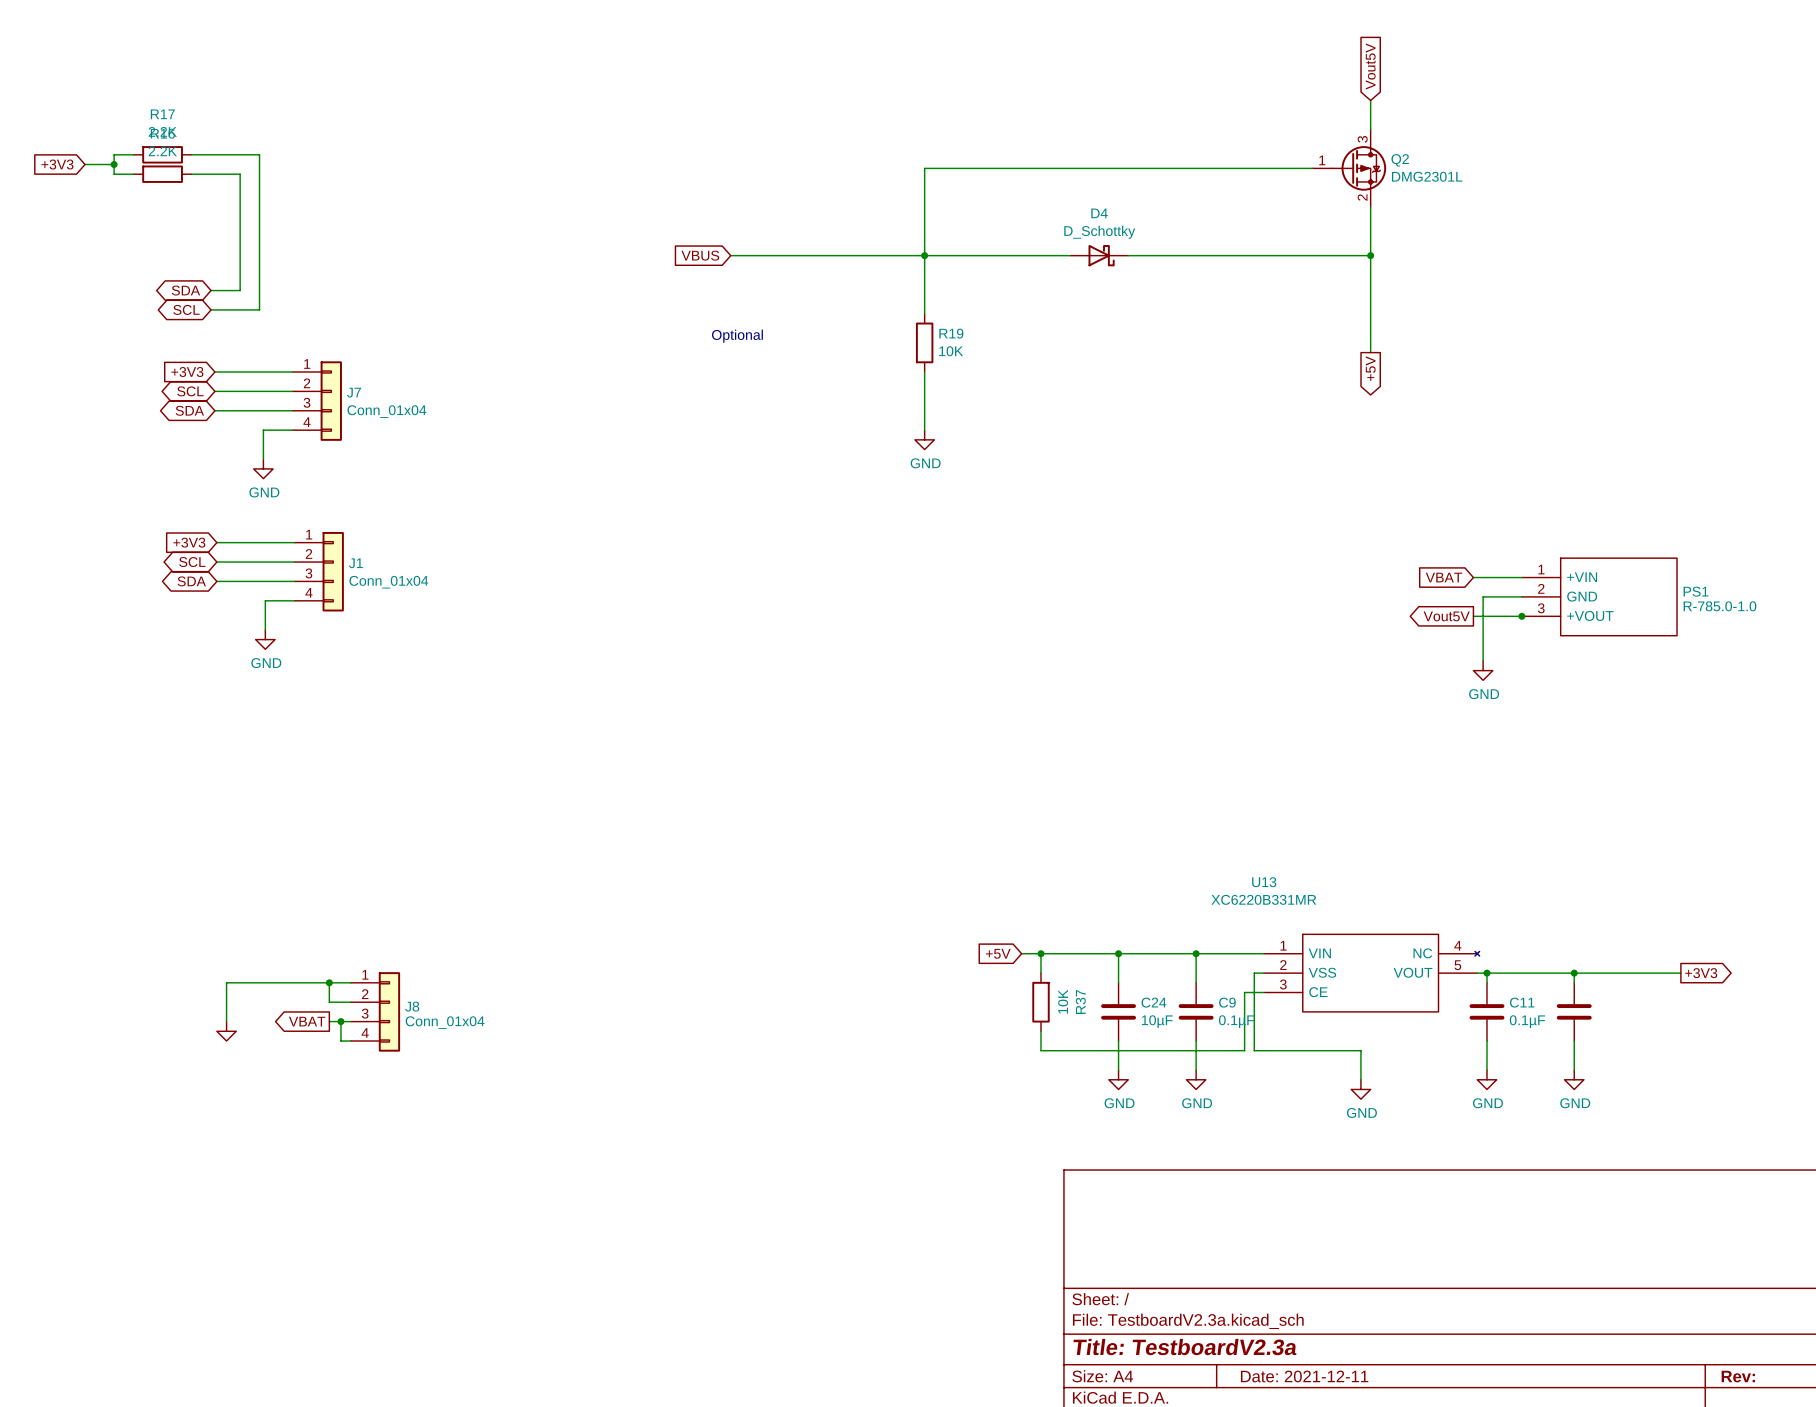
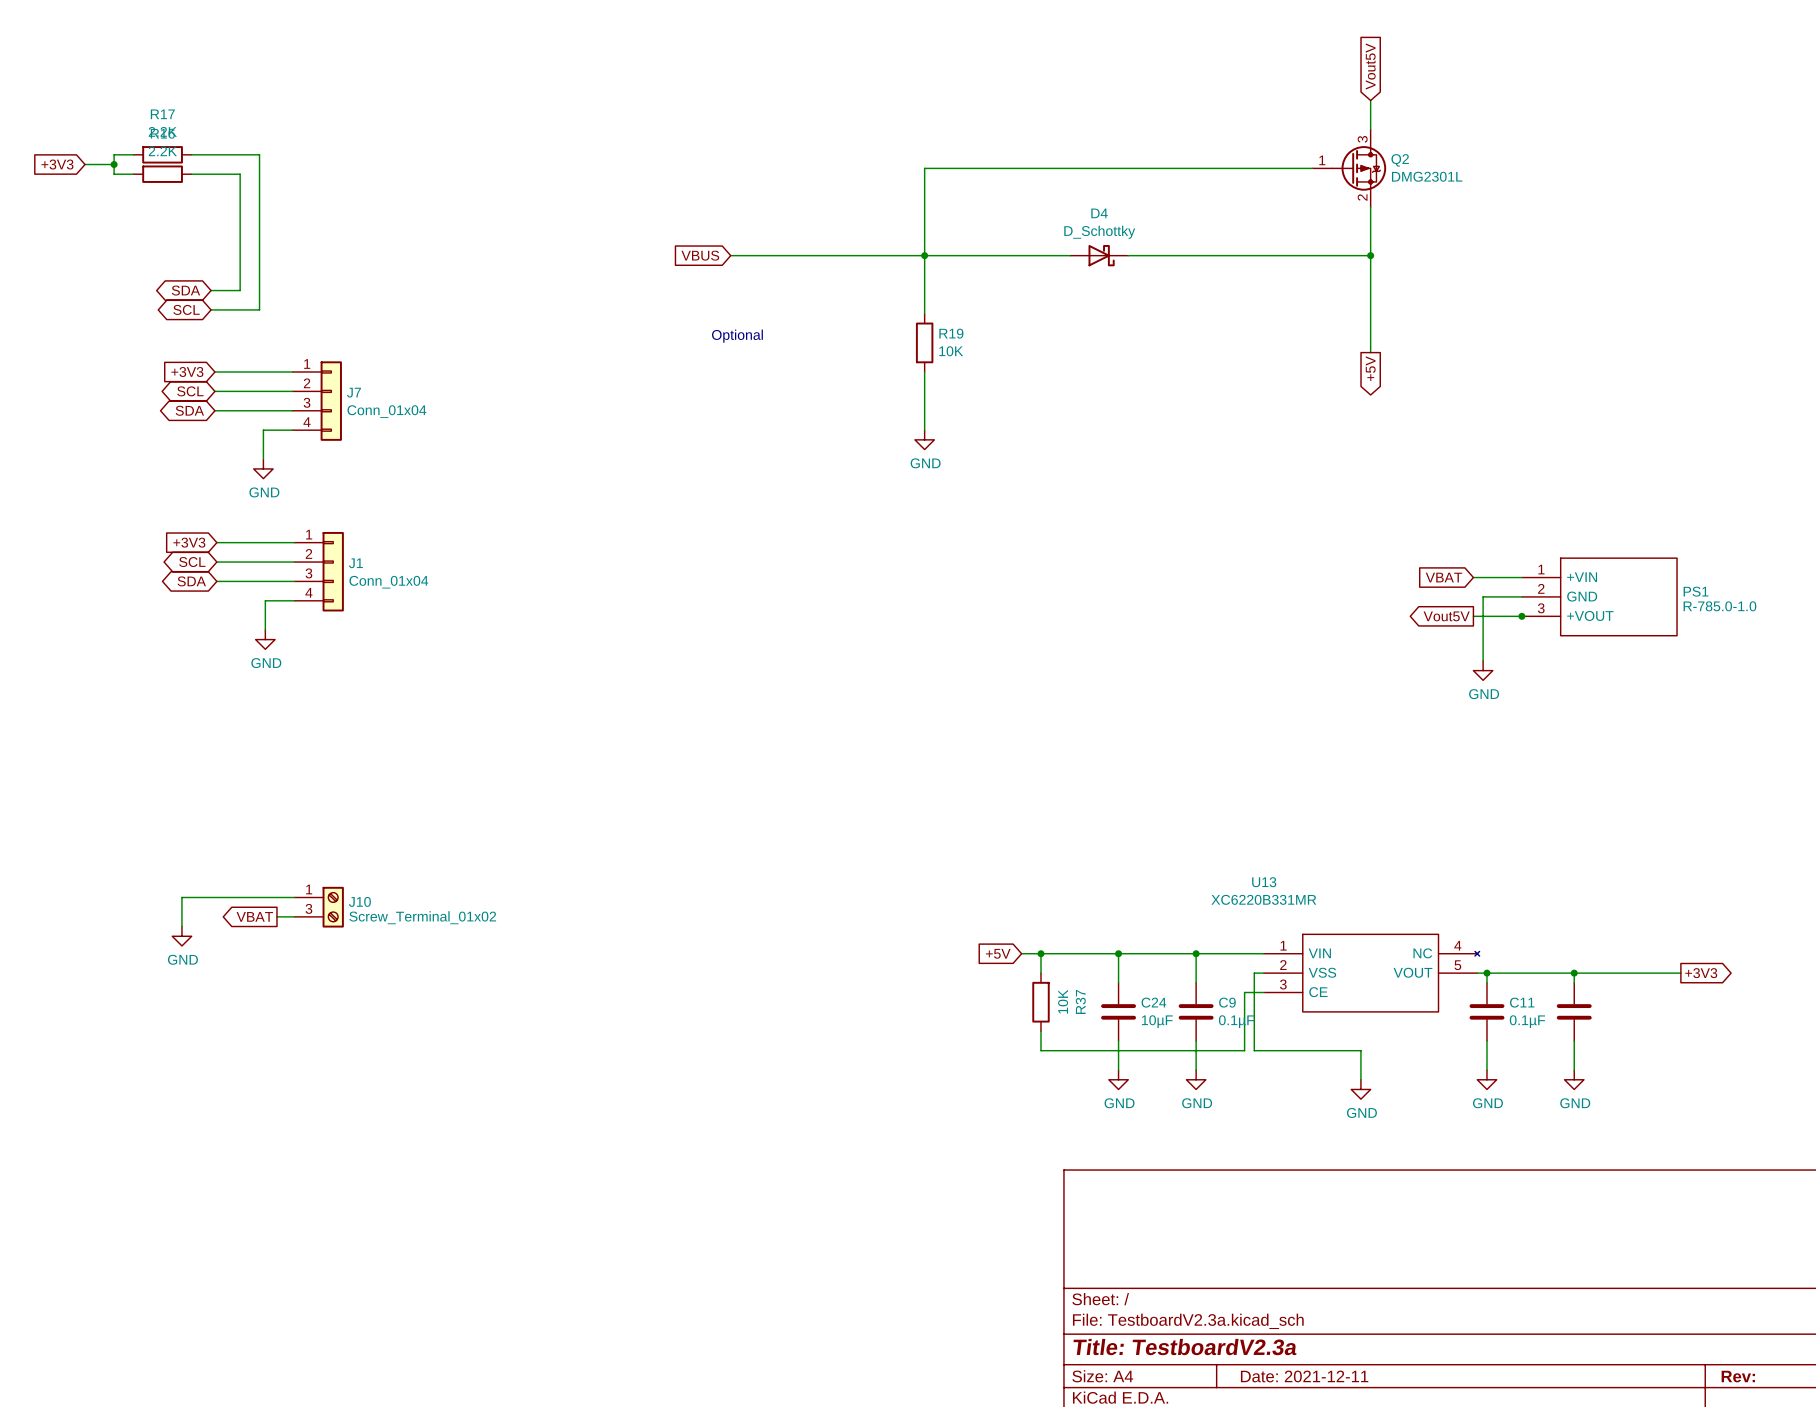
wire: none -> (294, 897) (181, 897) (181, 926)
J10: none -> Screw_Terminal_01x02 (319, 907)
wire: none -> (276, 916) (294, 916)
power symbol: none -> GND (181, 936)
wire: (329, 982) (329, 1002) (350, 1002) -> none
junction: (329, 982) -> none
wire: (350, 982) (226, 982) (226, 1021) -> none
J8: Conn_01x04 (375, 1011) -> none
global label position: VBAT (307, 1021) -> VBAT (254, 916)
wire: (329, 1021) (350, 1021) -> none
wire: (340, 1021) (340, 1040) (350, 1040) -> none
junction: (340, 1021) -> none
power symbol: (226, 1031) -> none

